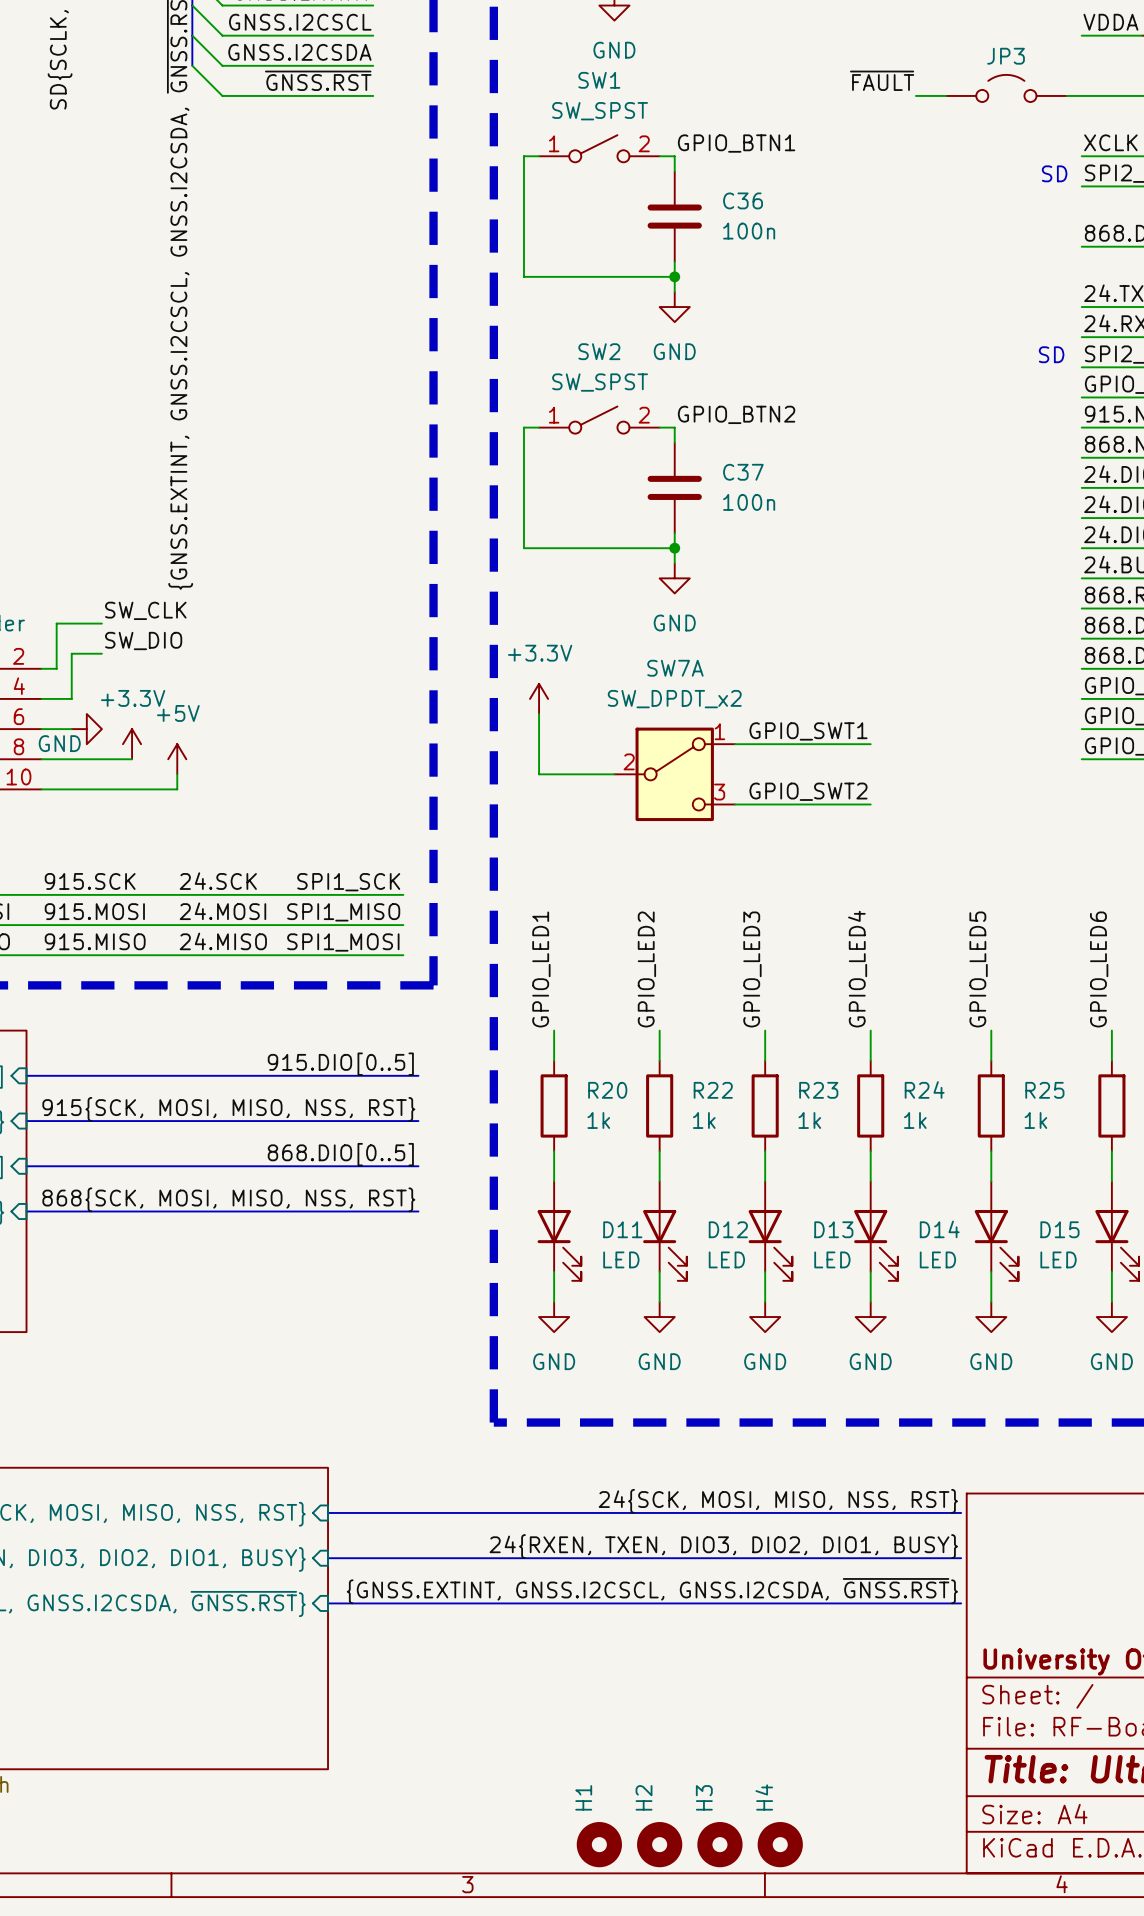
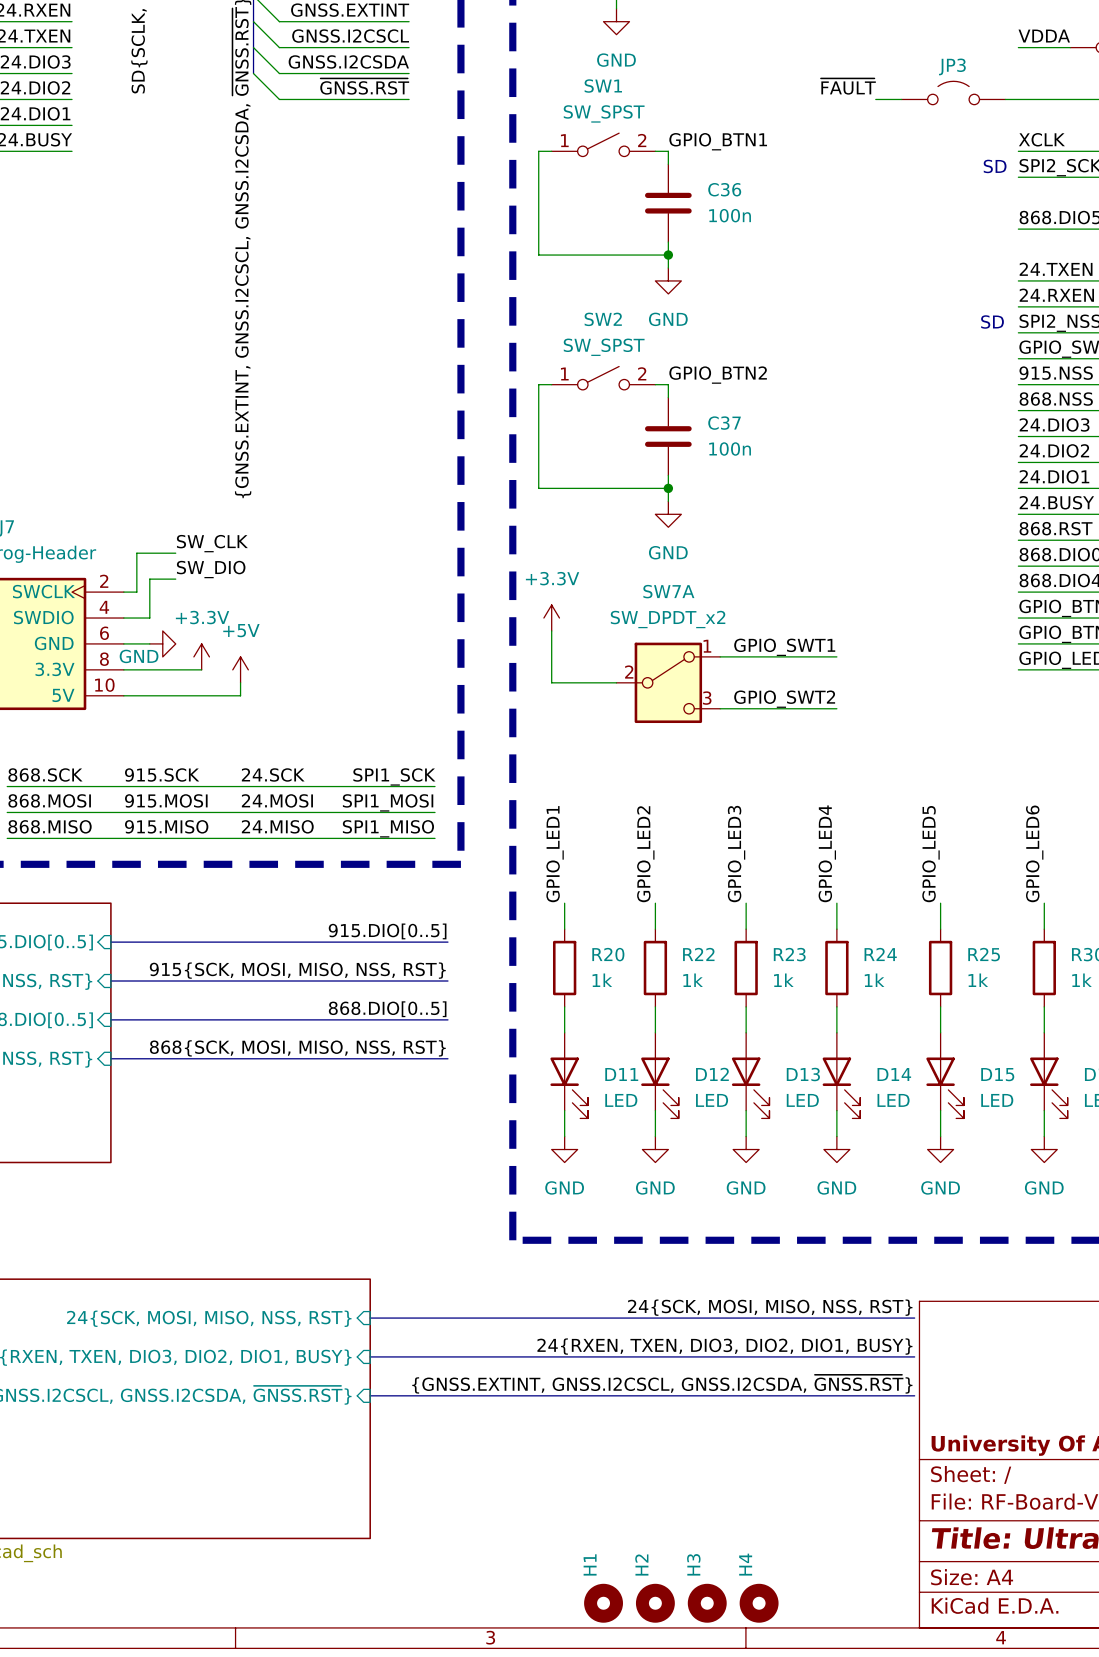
label: SPI1_MISO (343, 912) -> SPI1_MOSI (388, 802)
label: SPI1_MOSI (343, 942) -> SPI1_MISO (388, 828)

